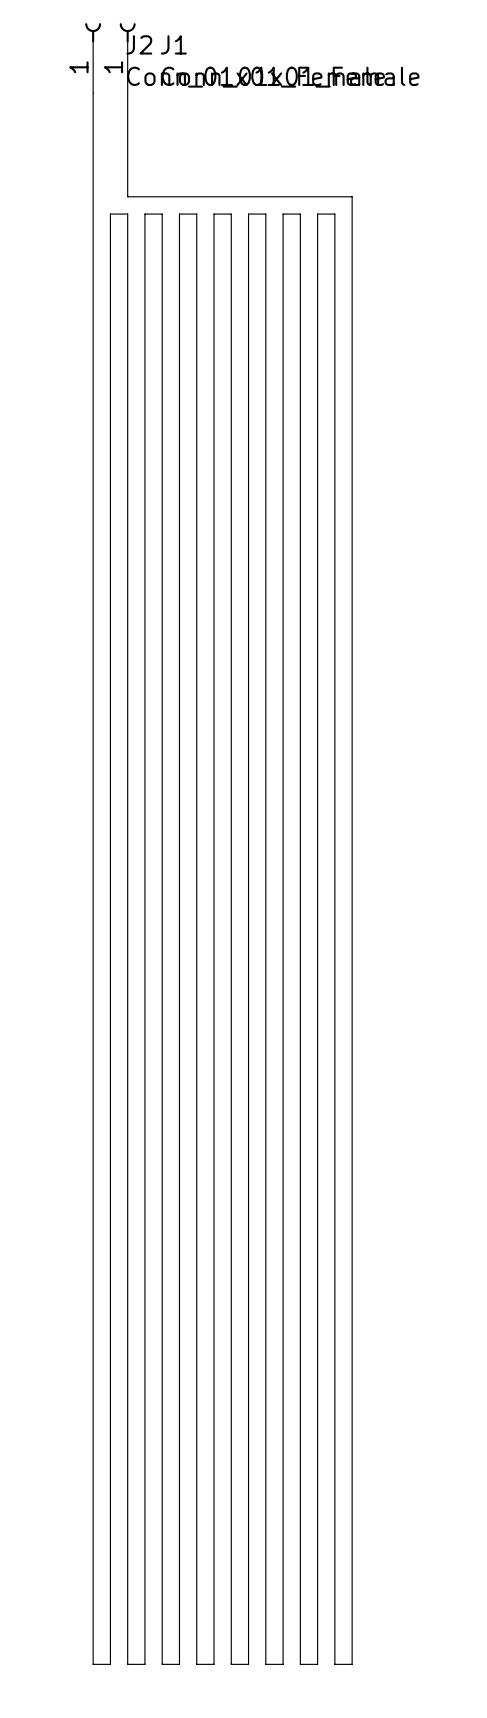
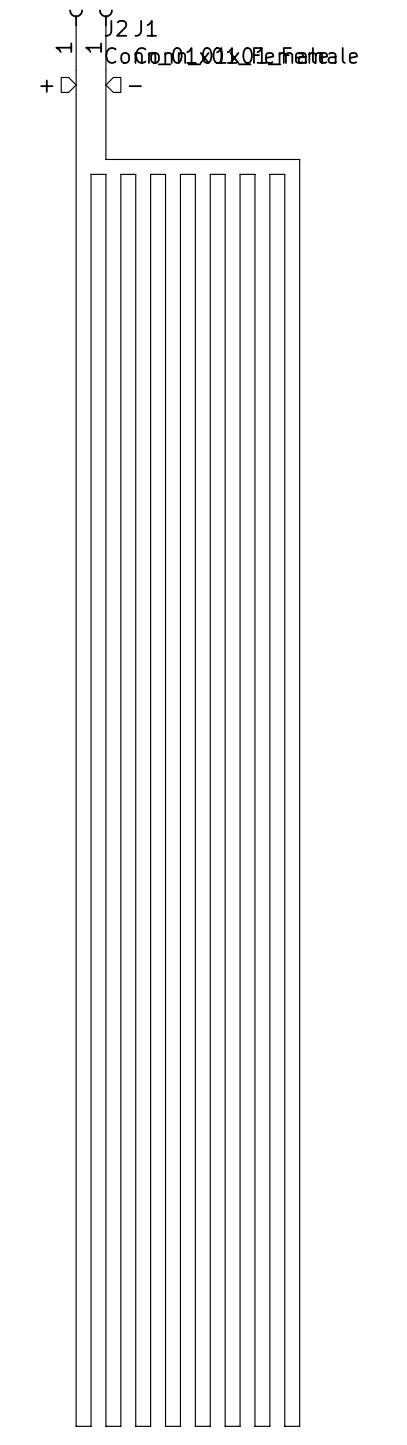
hierarchical label: none -> + (46, 86)
hierarchical label: none -> - (135, 86)

